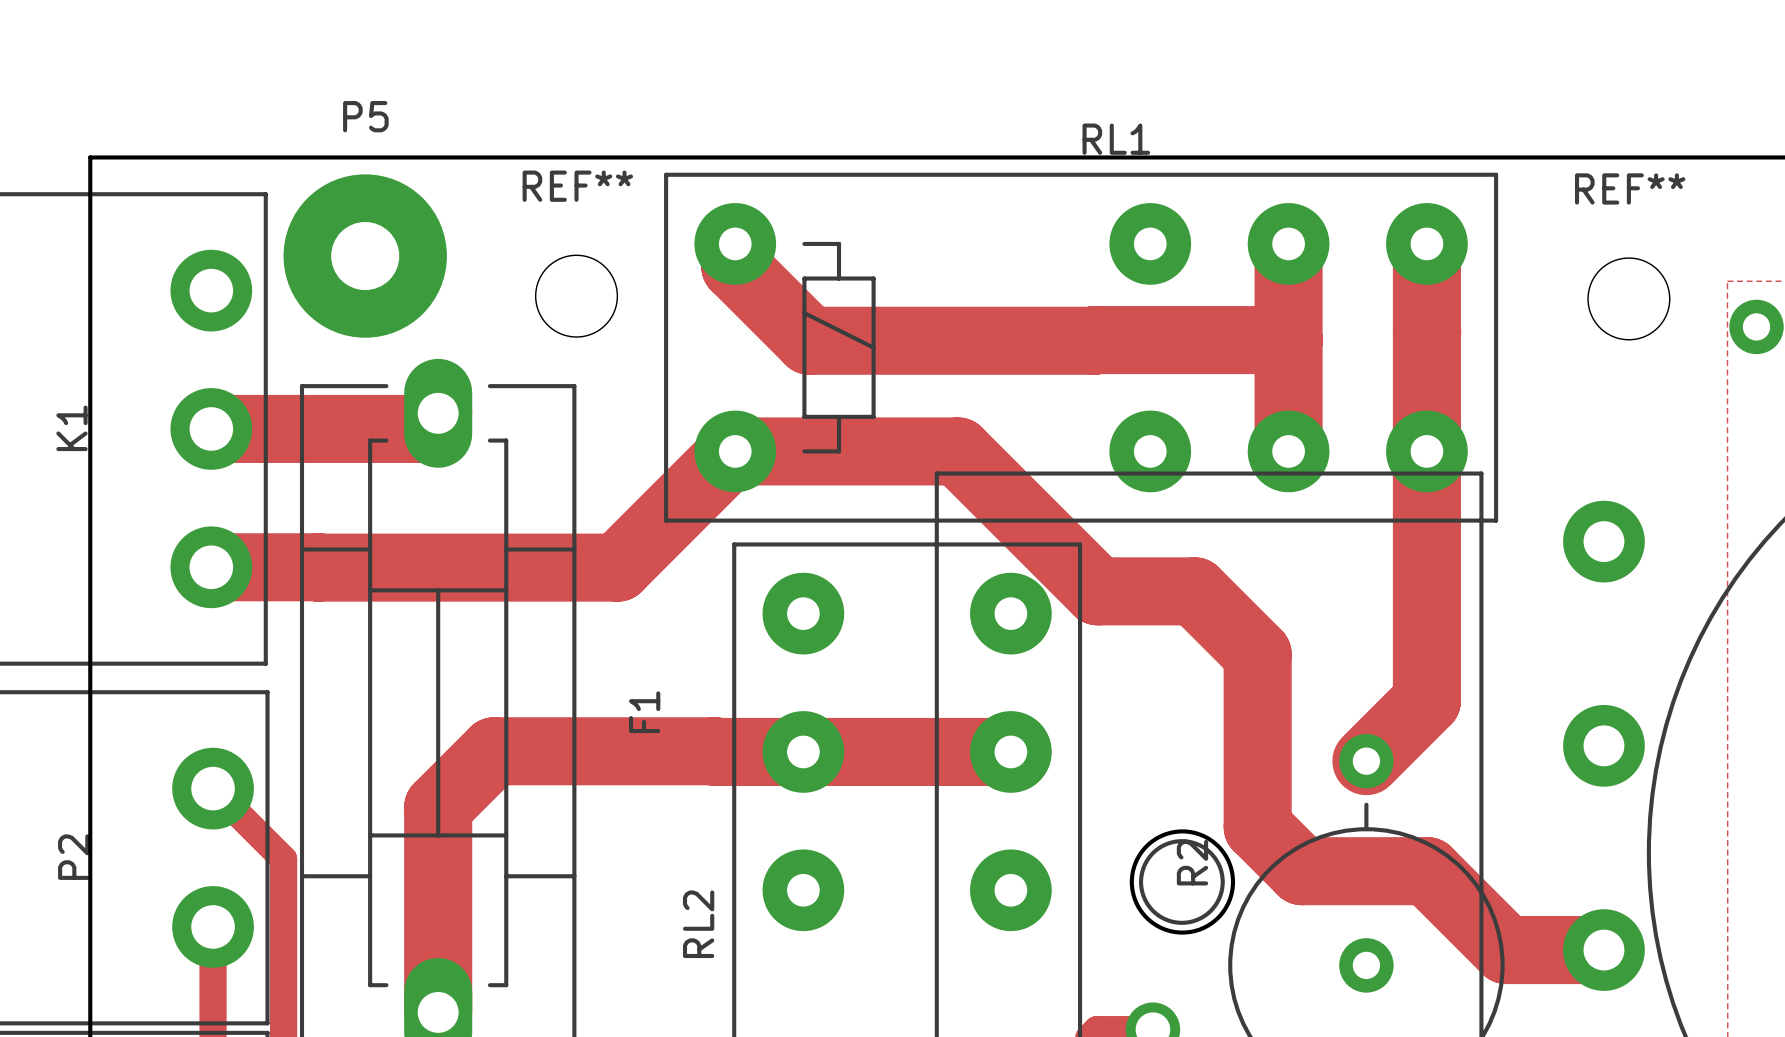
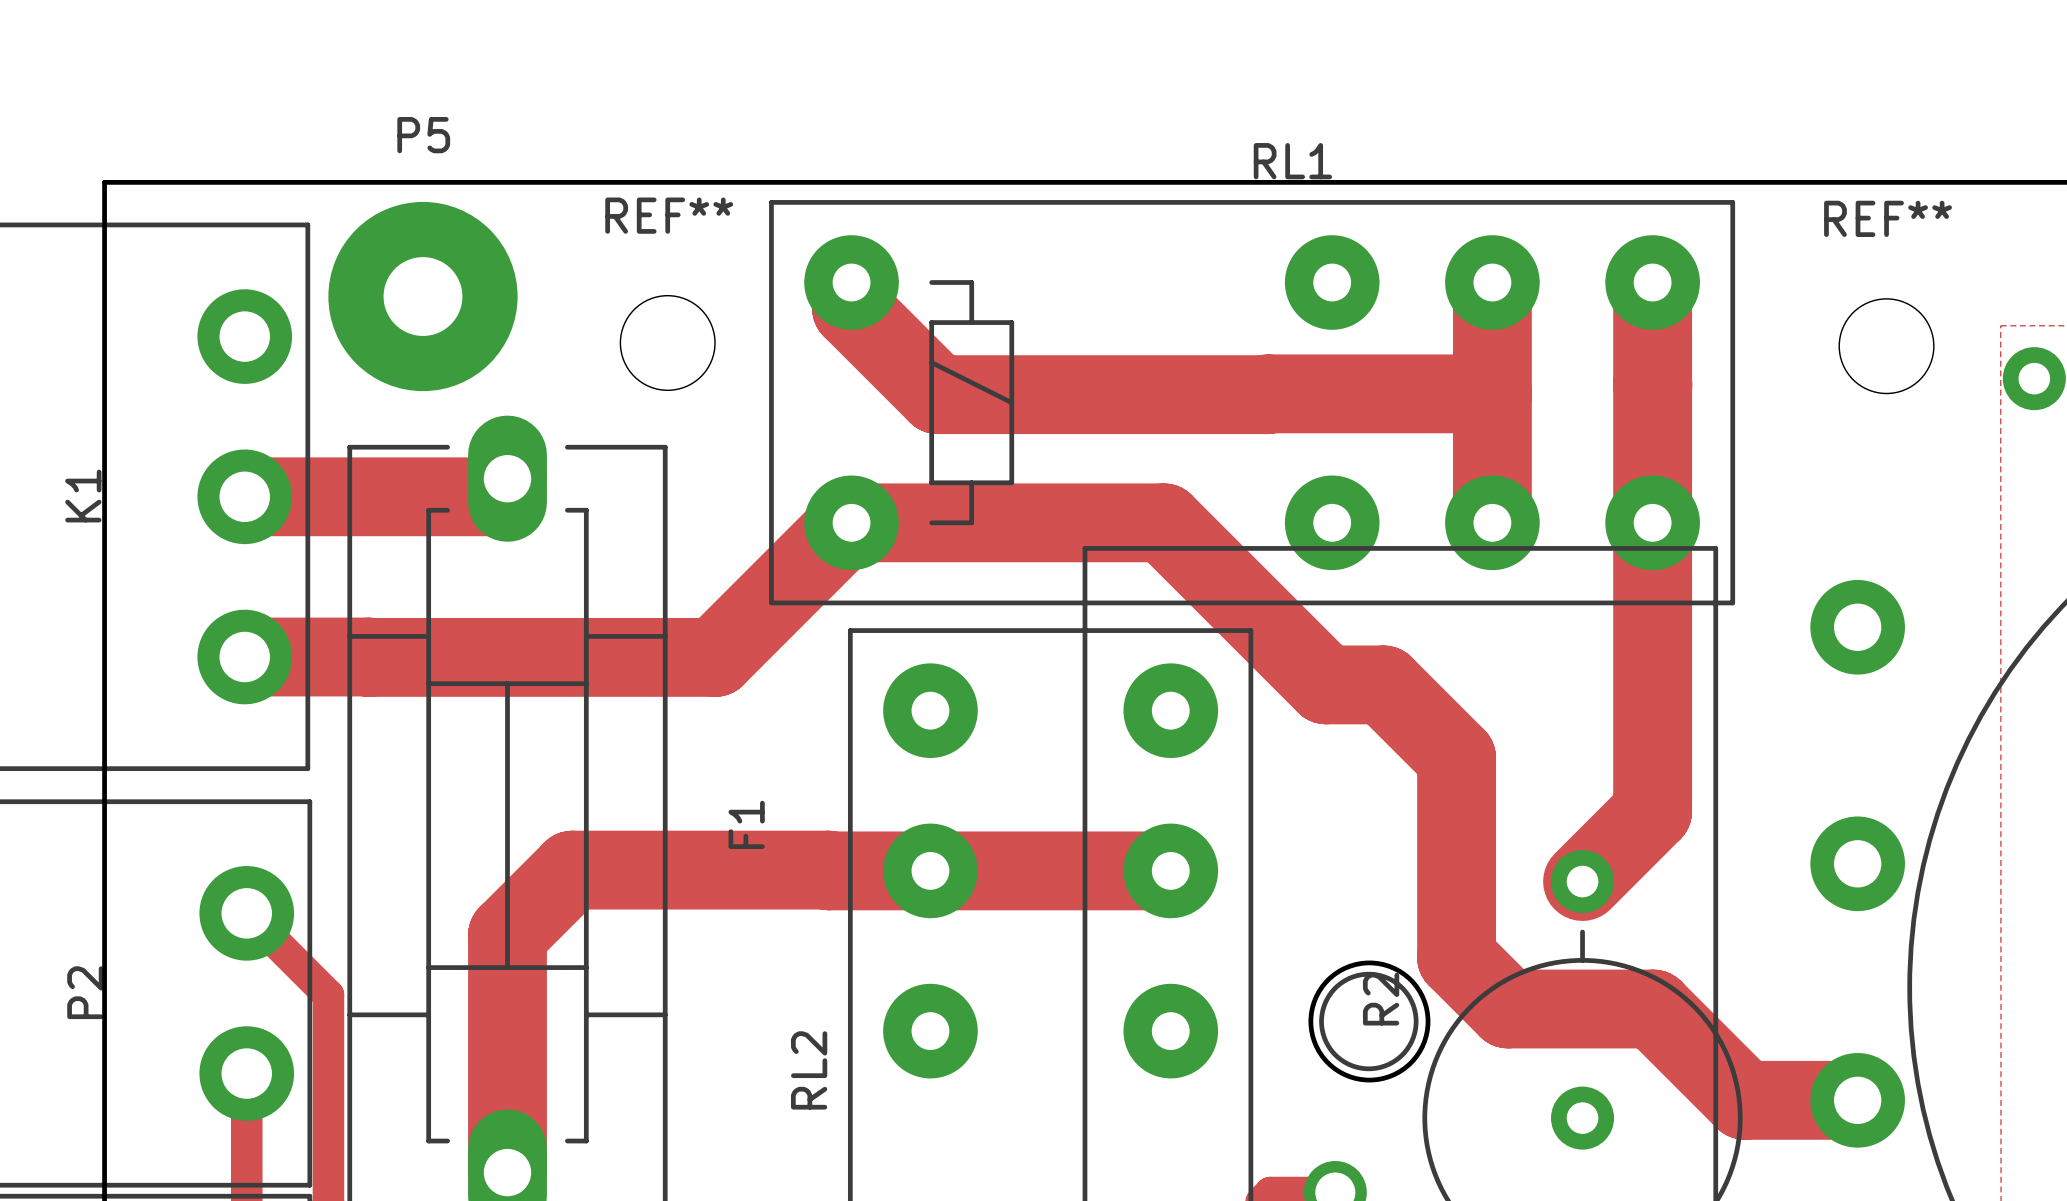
track: (957, 451) (1097, 591) (1144, 591) -> (1109, 522) (1163, 522) (1326, 684)

